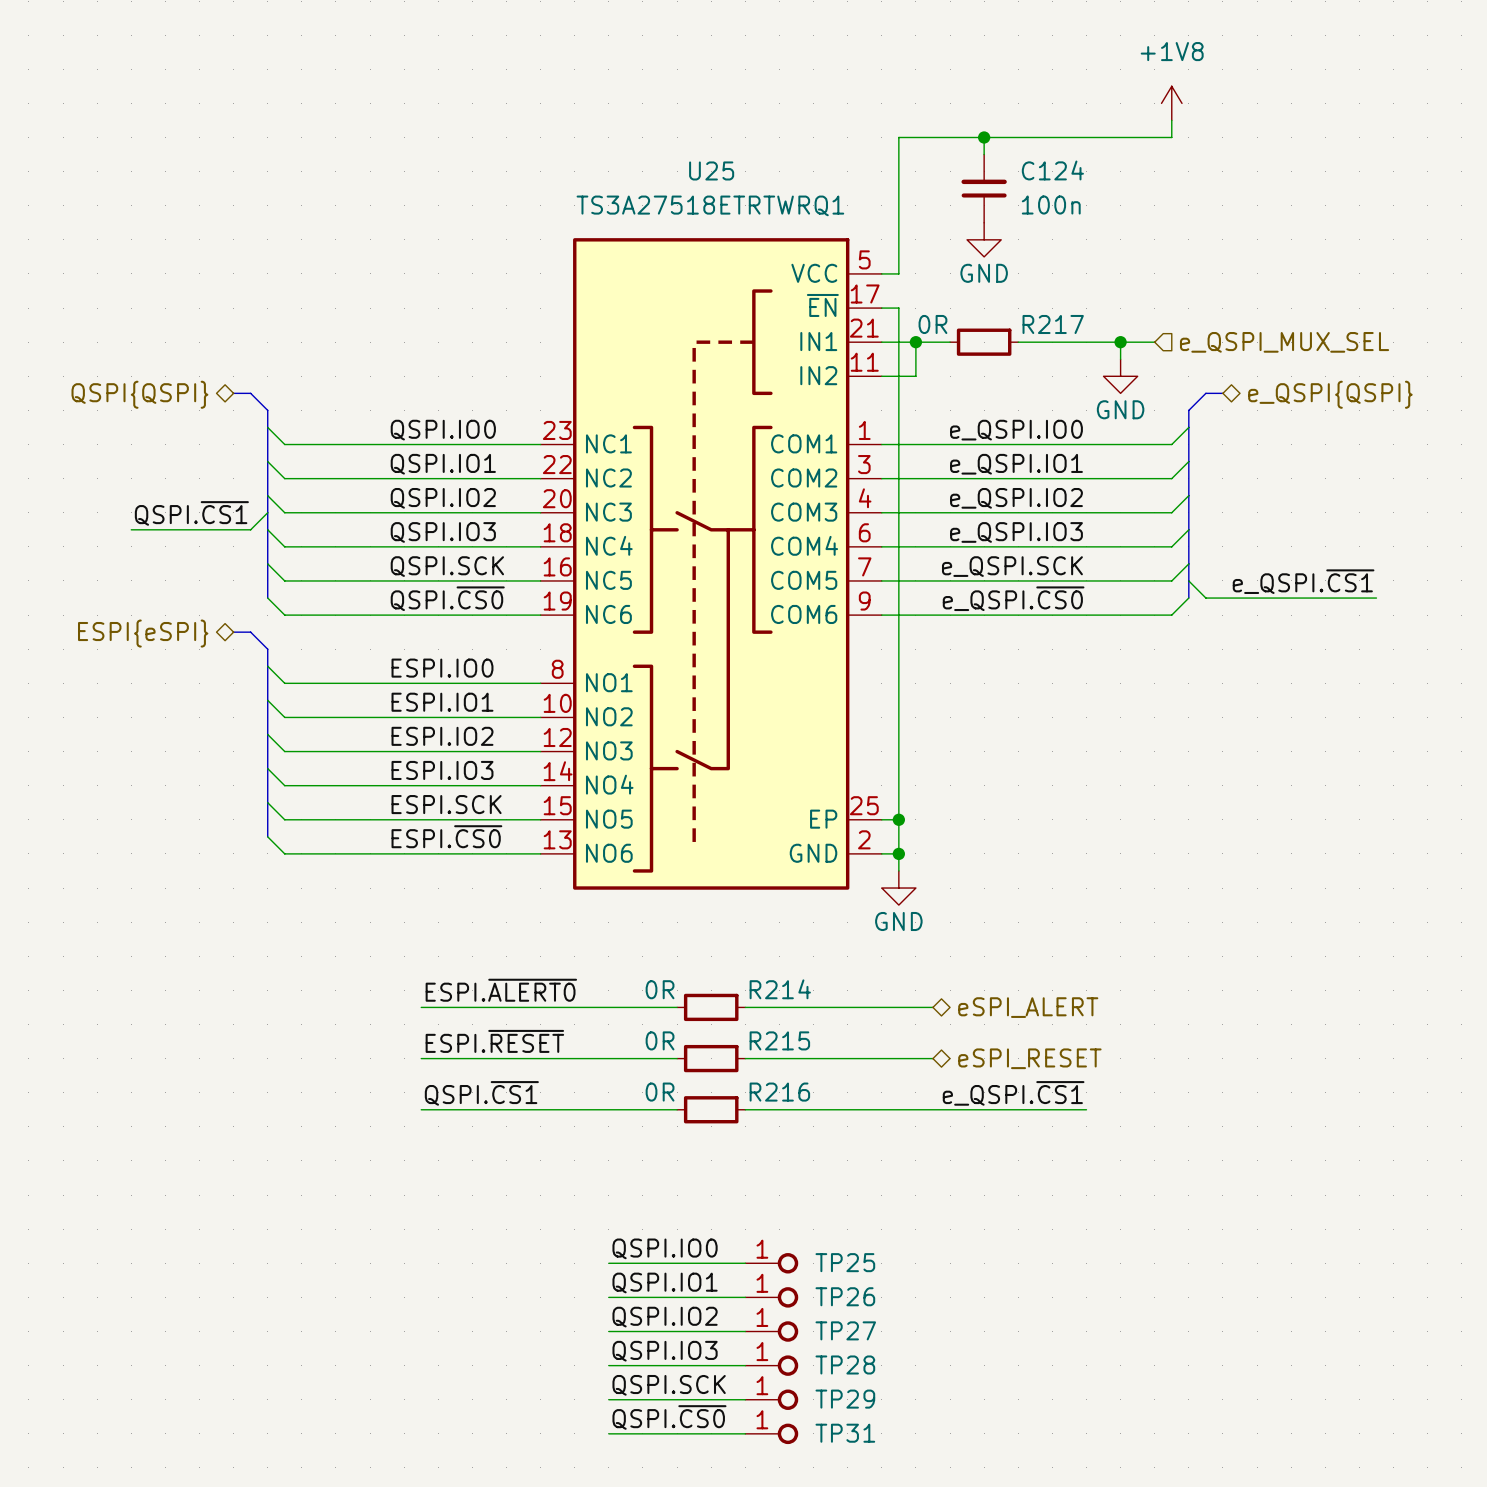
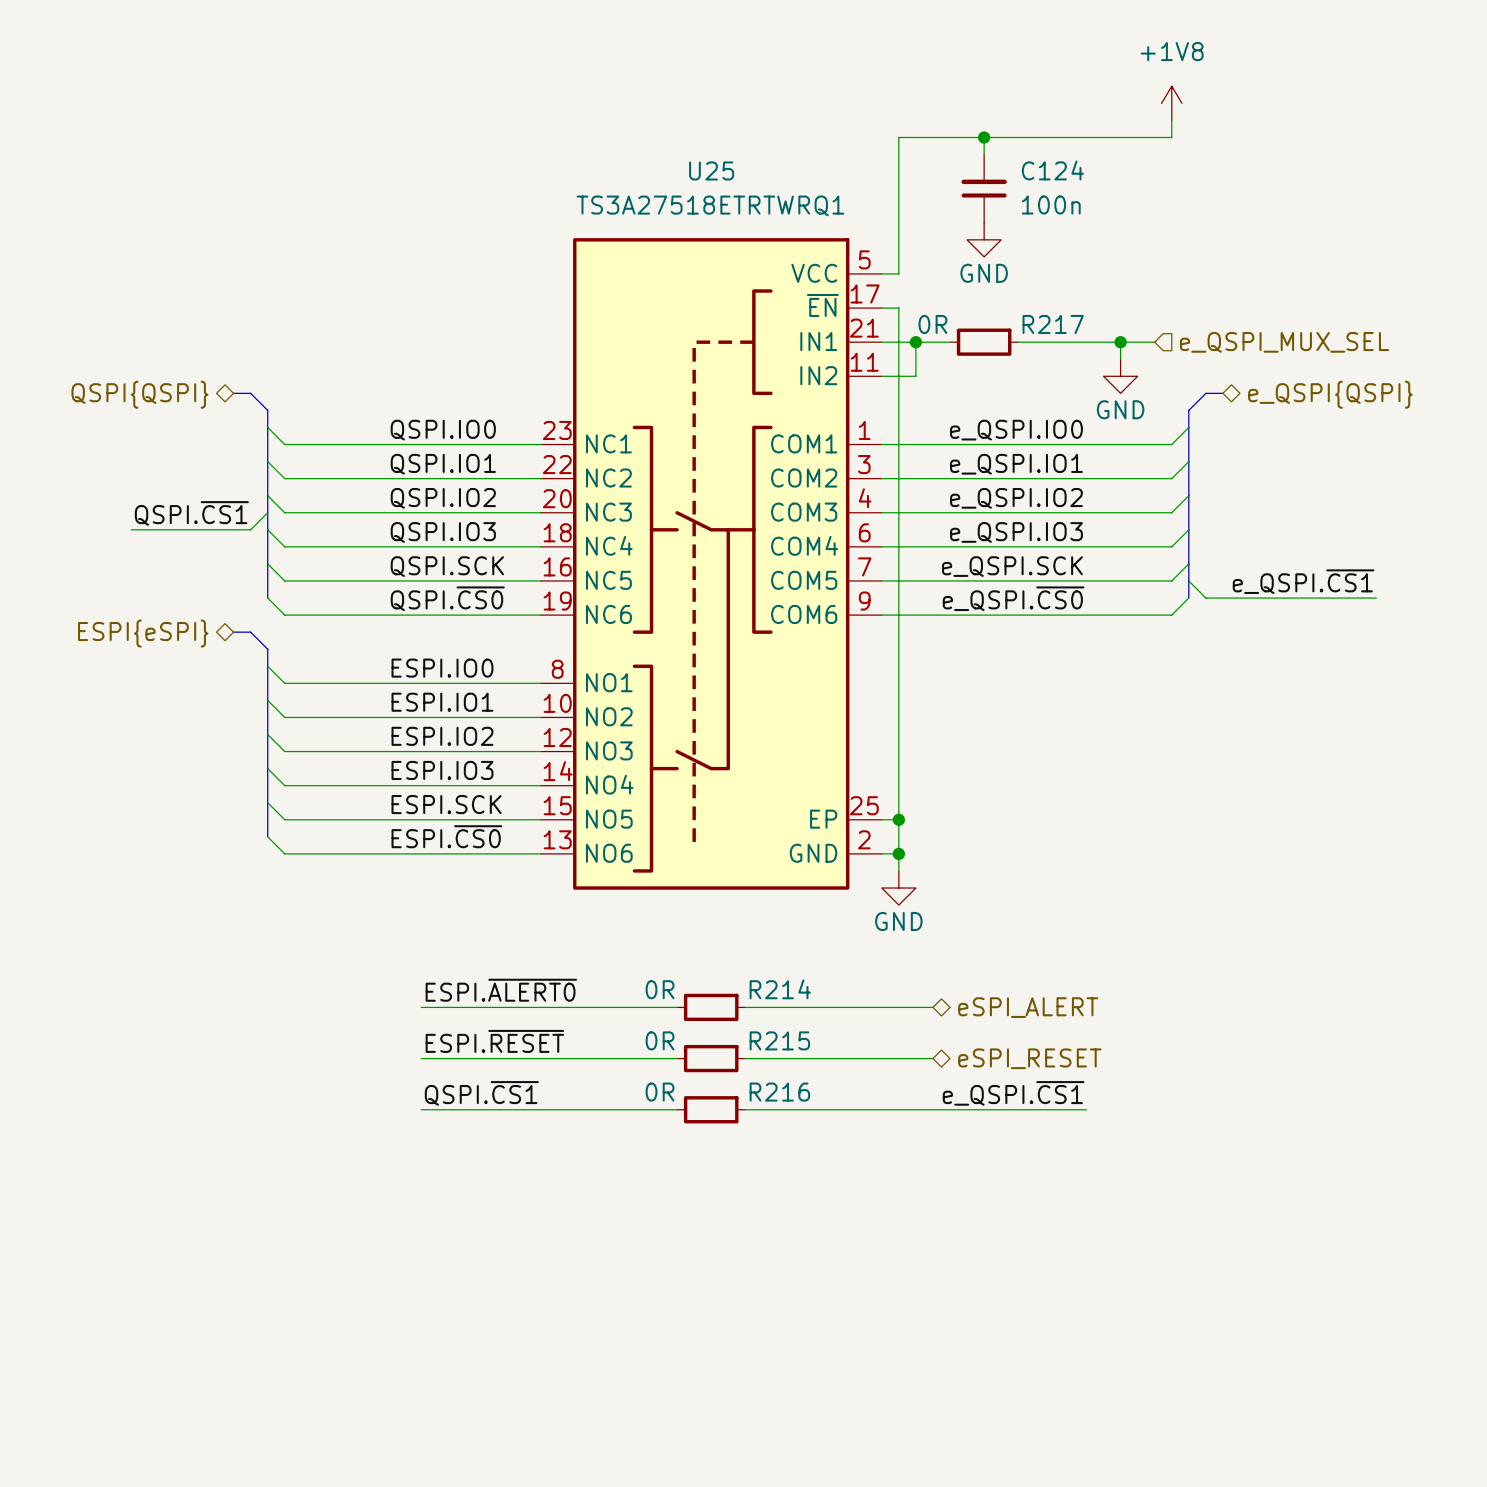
label: QSPI.IO0 (665, 1248) -> none
wire: (608, 1263) (745, 1263) -> none
TP25: (771, 1263) -> none
label: QSPI.IO1 (665, 1282) -> none
wire: (608, 1297) (745, 1297) -> none
TP26: (771, 1297) -> none
label: QSPI.IO2 (665, 1317) -> none
wire: (608, 1331) (745, 1331) -> none
TP27: (771, 1331) -> none
label: QSPI.IO3 (665, 1351) -> none
wire: (608, 1365) (745, 1365) -> none
TP28: (771, 1365) -> none
label: QSPI.SCK (669, 1385) -> none
wire: (608, 1399) (745, 1399) -> none
TP29: (771, 1399) -> none
label: QSPI.~{CS0} (669, 1417) -> none
wire: (608, 1433) (745, 1433) -> none
TP31: (771, 1433) -> none

